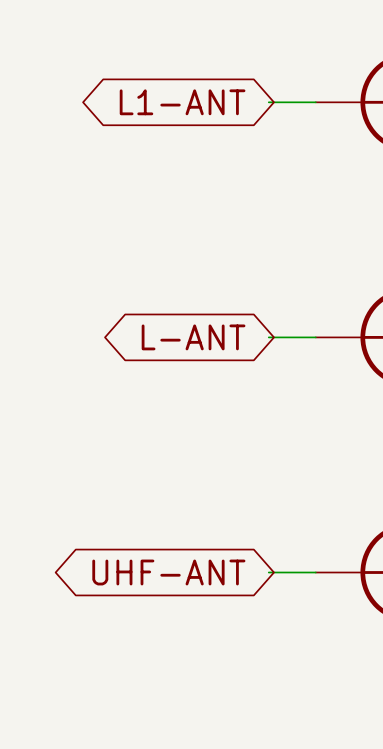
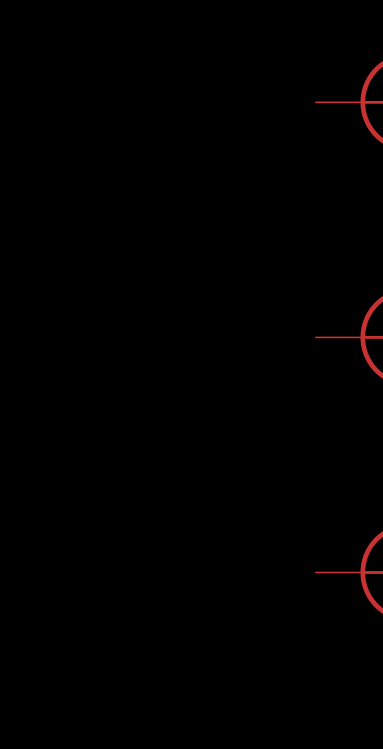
global label: L1-ANT (182, 102) -> none
wire: (268, 102) (315, 102) -> none
global label: L-ANT (193, 337) -> none
wire: (268, 337) (315, 337) -> none
global label: UHF-ANT (168, 572) -> none
wire: (268, 572) (315, 572) -> none

